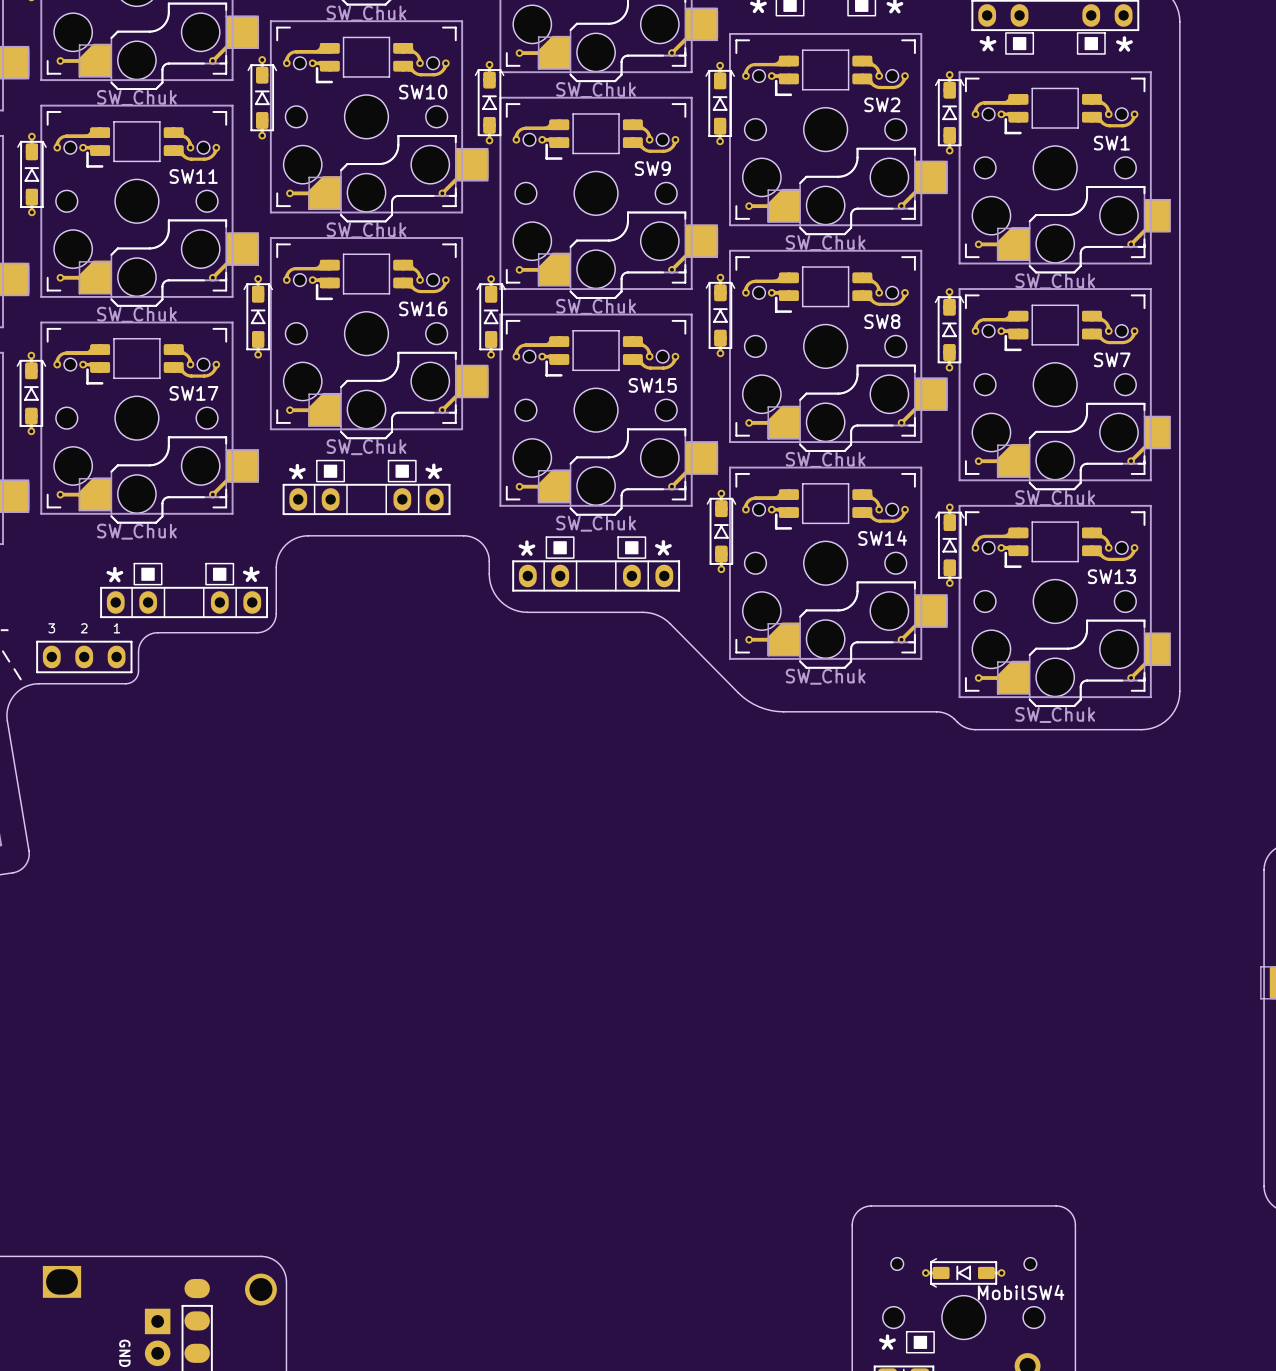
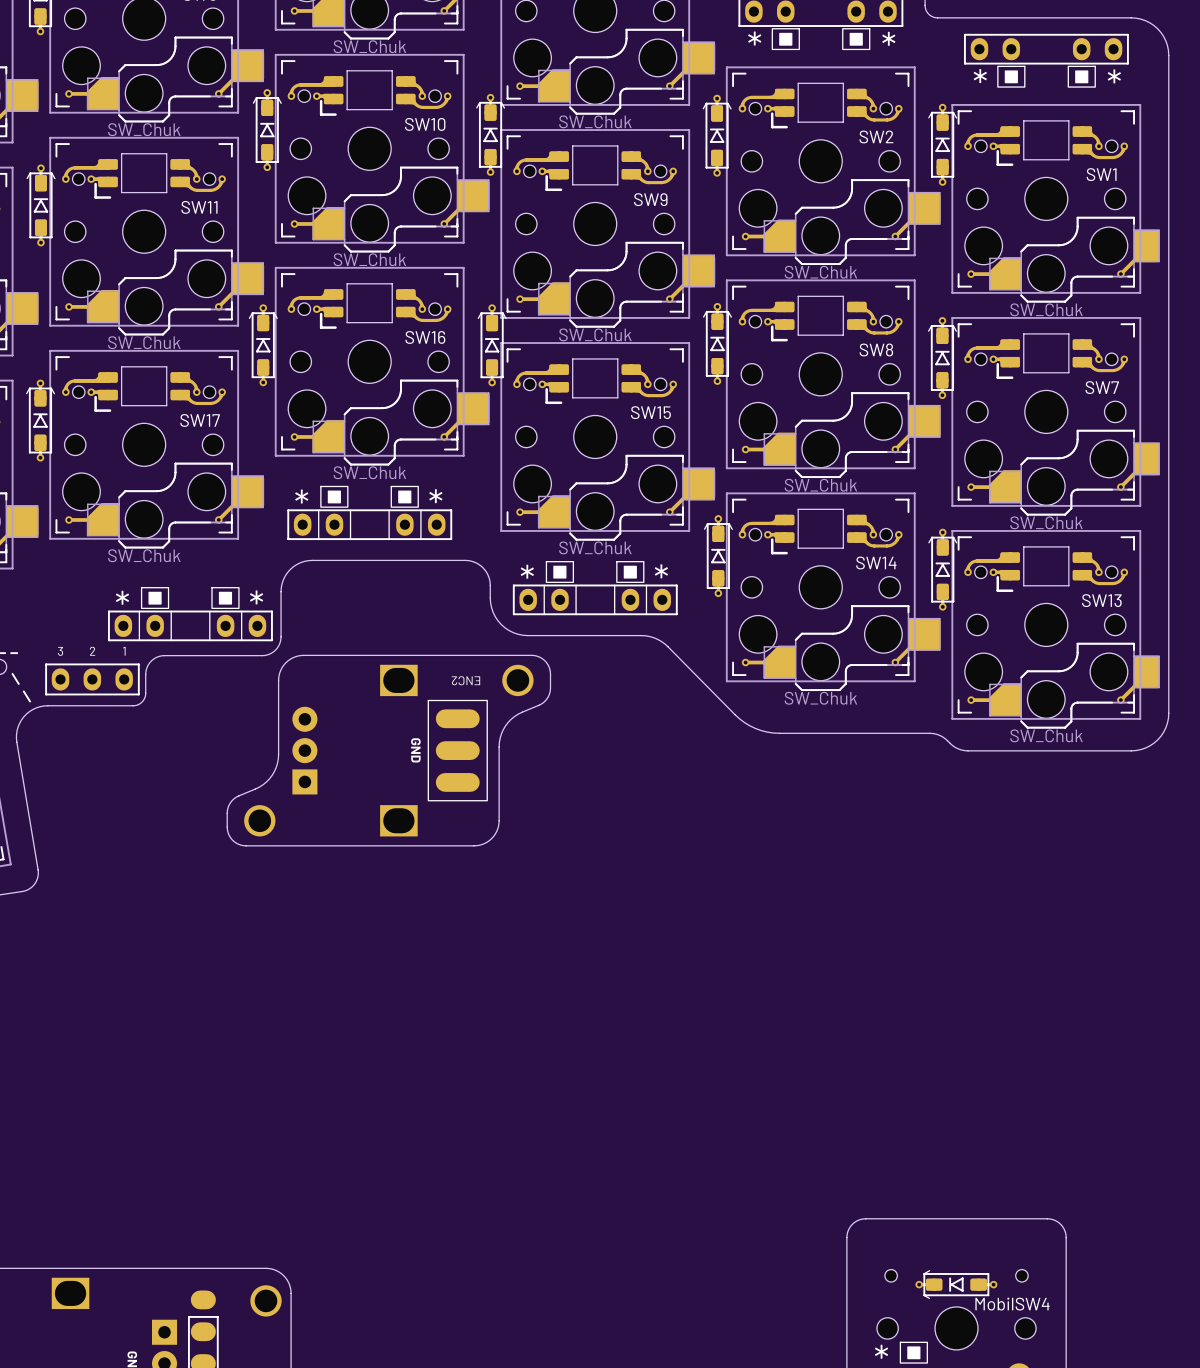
board edge: none -> (531, 655) (303, 655) (290, 659) (282, 667) (278, 677) (278, 754) (276, 767) (272, 775) (263, 784) (236, 796) (230, 802) (227, 813) (227, 829) (229, 836) (236, 843) (246, 845) (474, 845) (487, 842) (495, 834) (498, 823) (499, 746) (501, 733) (511, 719) (542, 703) (549, 692) (550, 671) (547, 664) (541, 657) (531, 655)
part: none -> (517, 680)
ENC2: none -> (355, 750)
part: none -> (457, 750)
part: none -> (259, 820)

